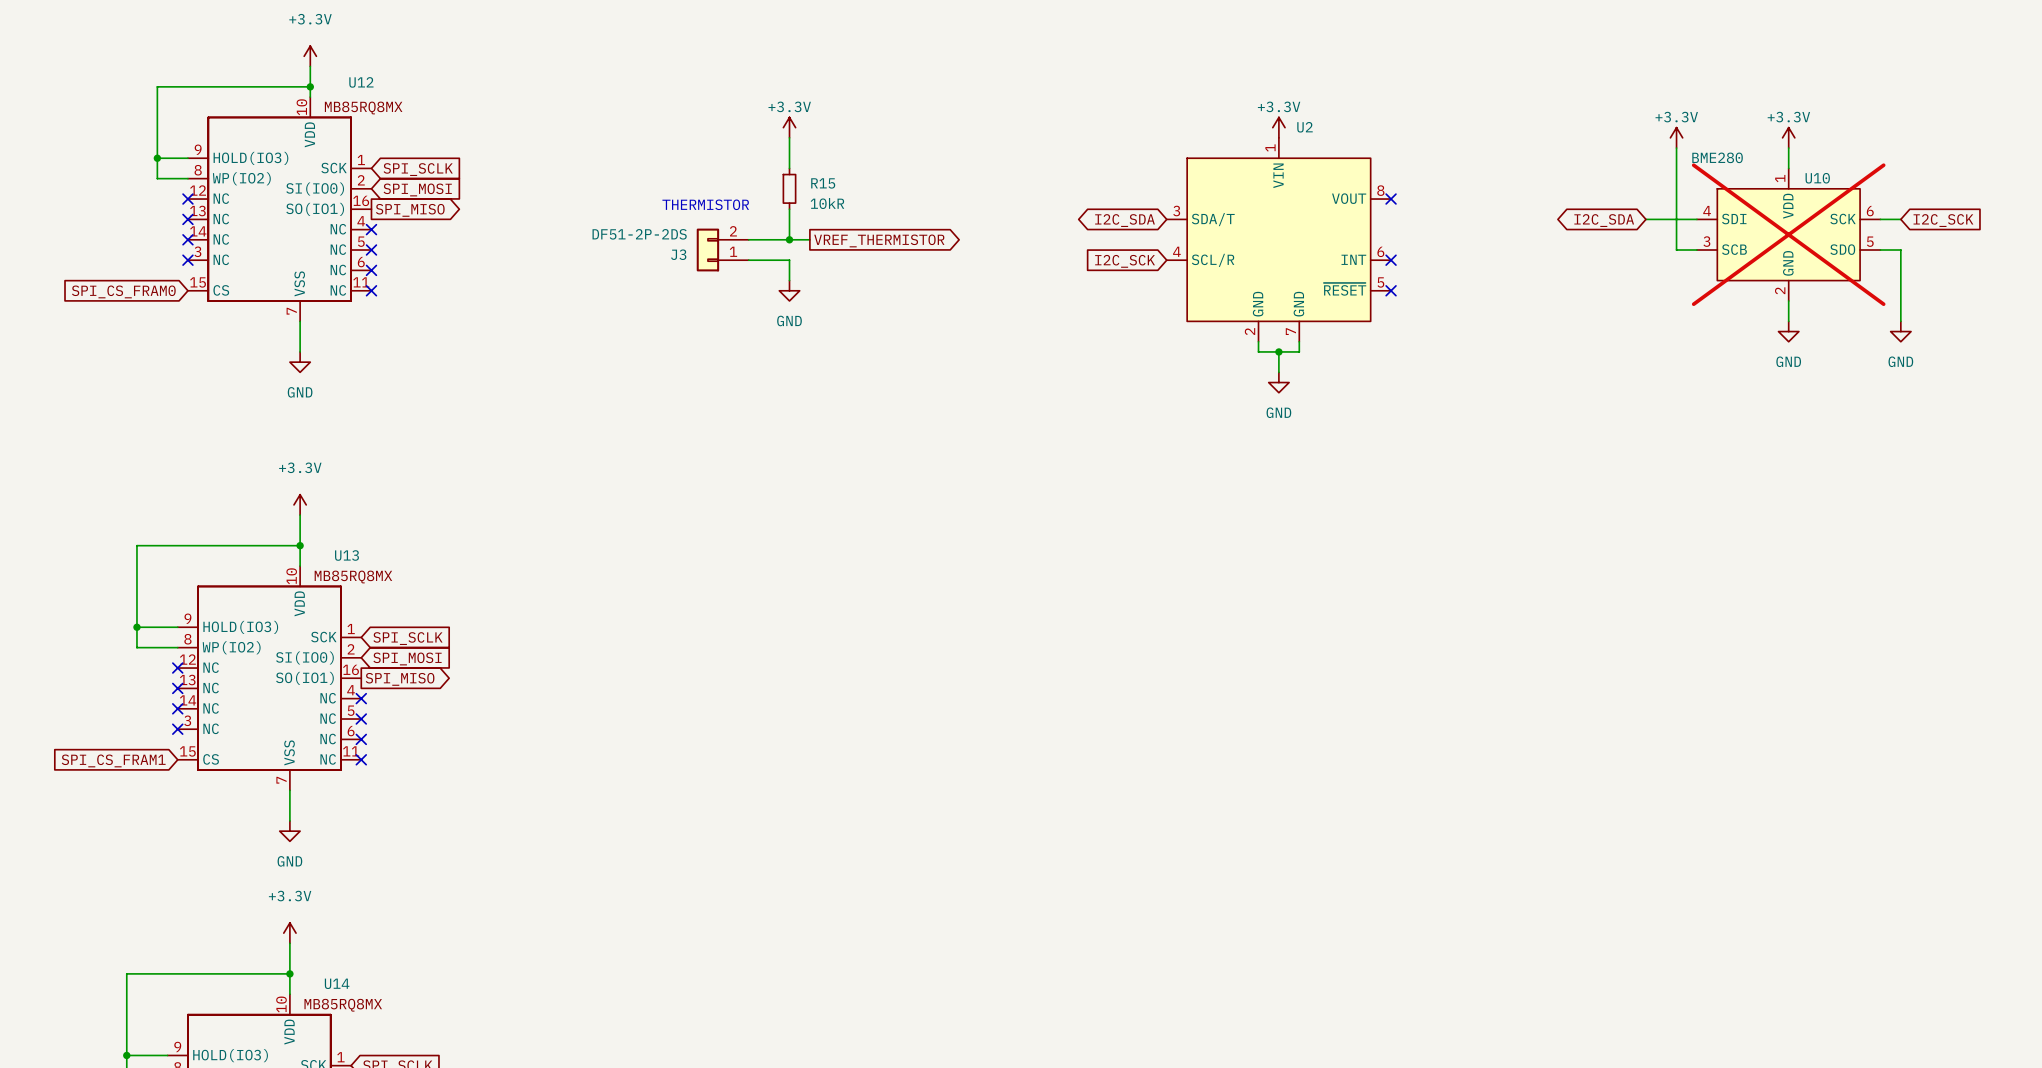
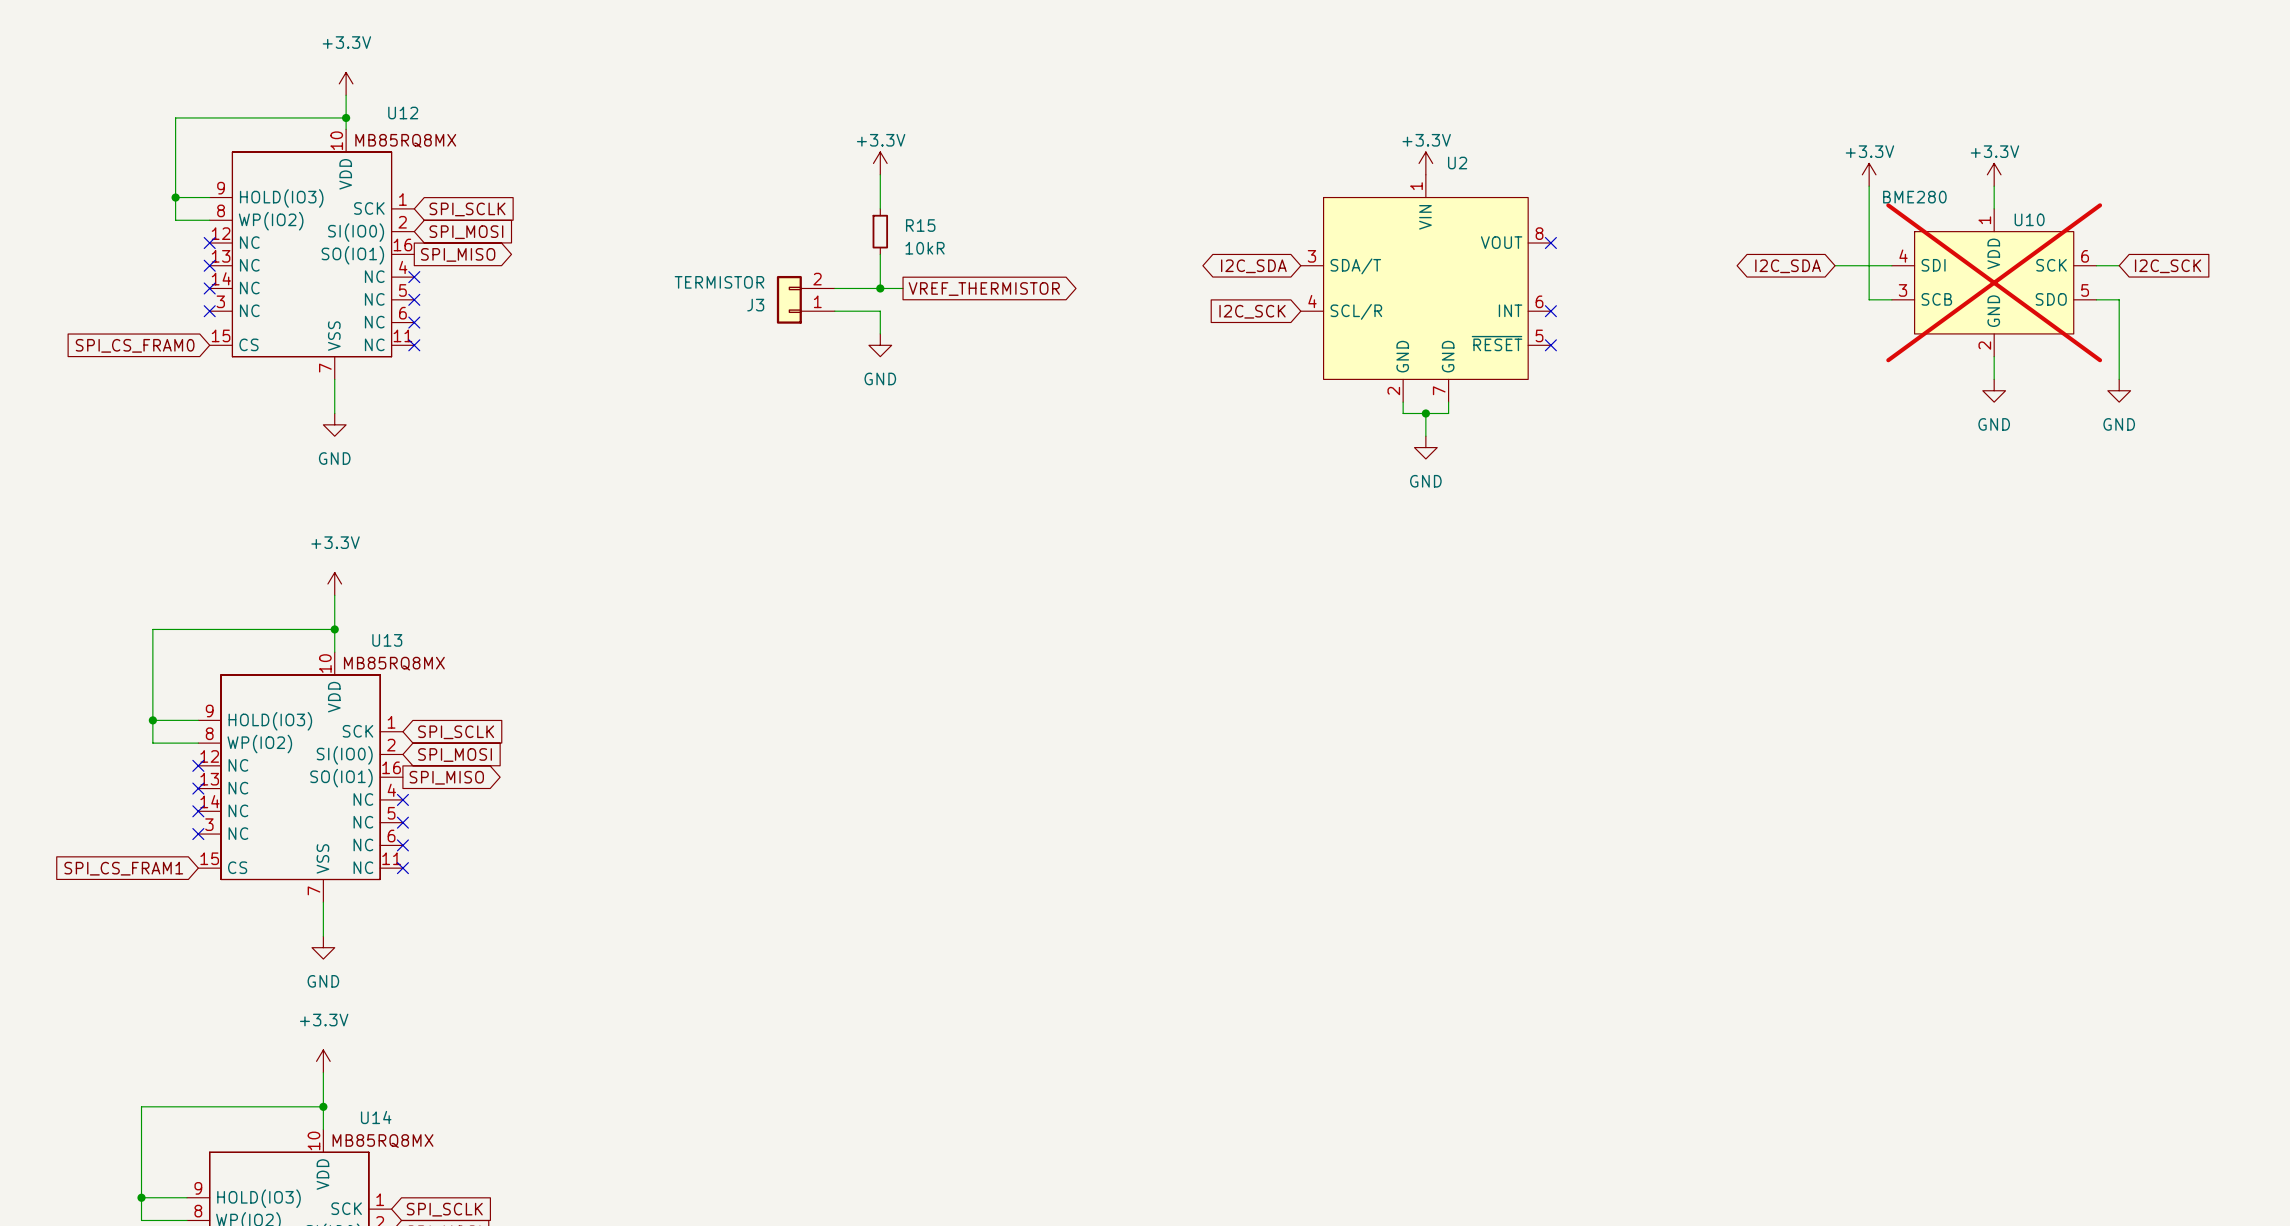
text: THERMISTOR (705, 204) -> none
J3 value: DF51-2P-2DS (639, 234) -> TERMISTOR (719, 282)

